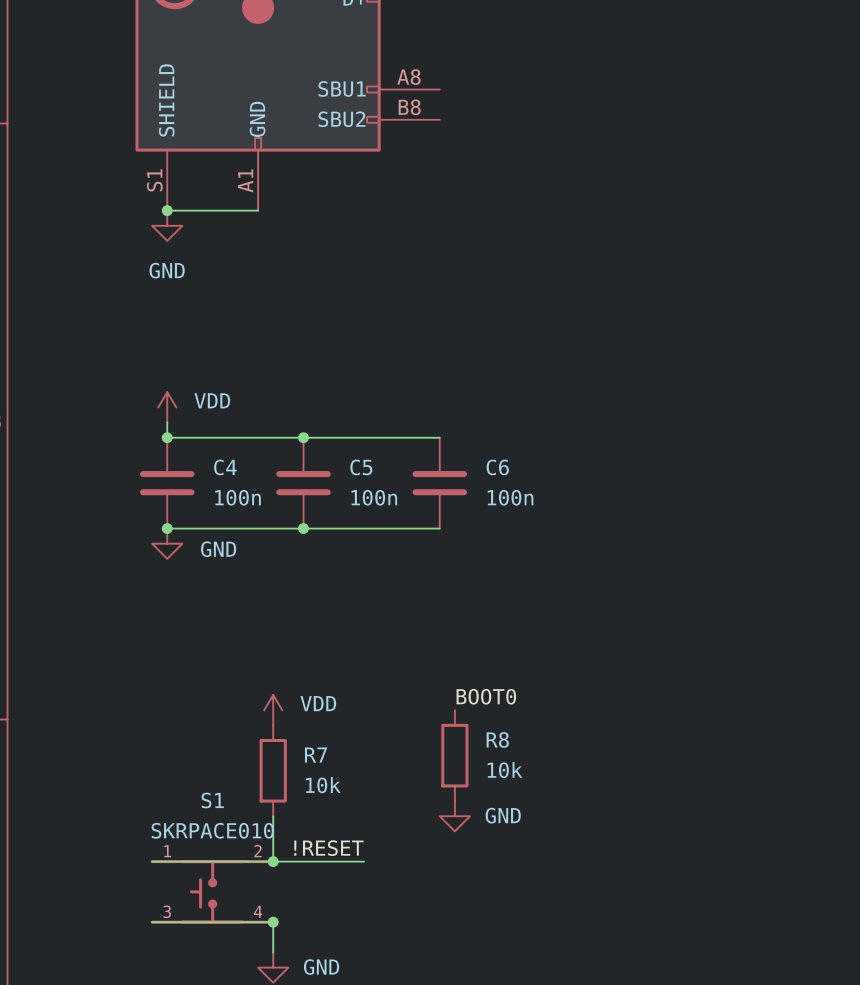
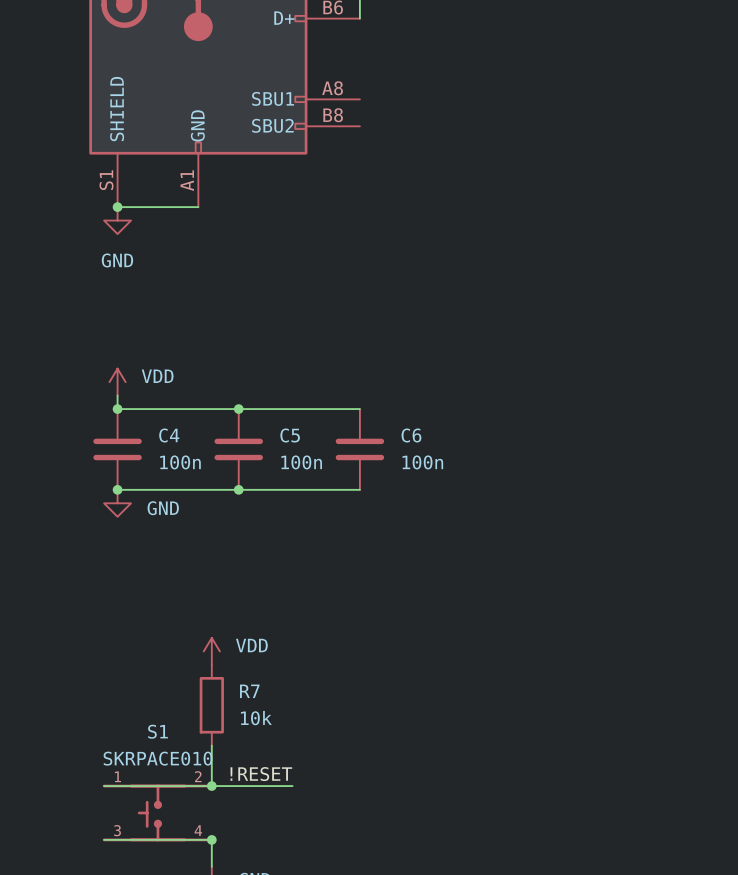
label: BOOT0 (486, 696) -> none
R8: 10k (454, 755) -> none
power symbol: GND (454, 816) -> none

